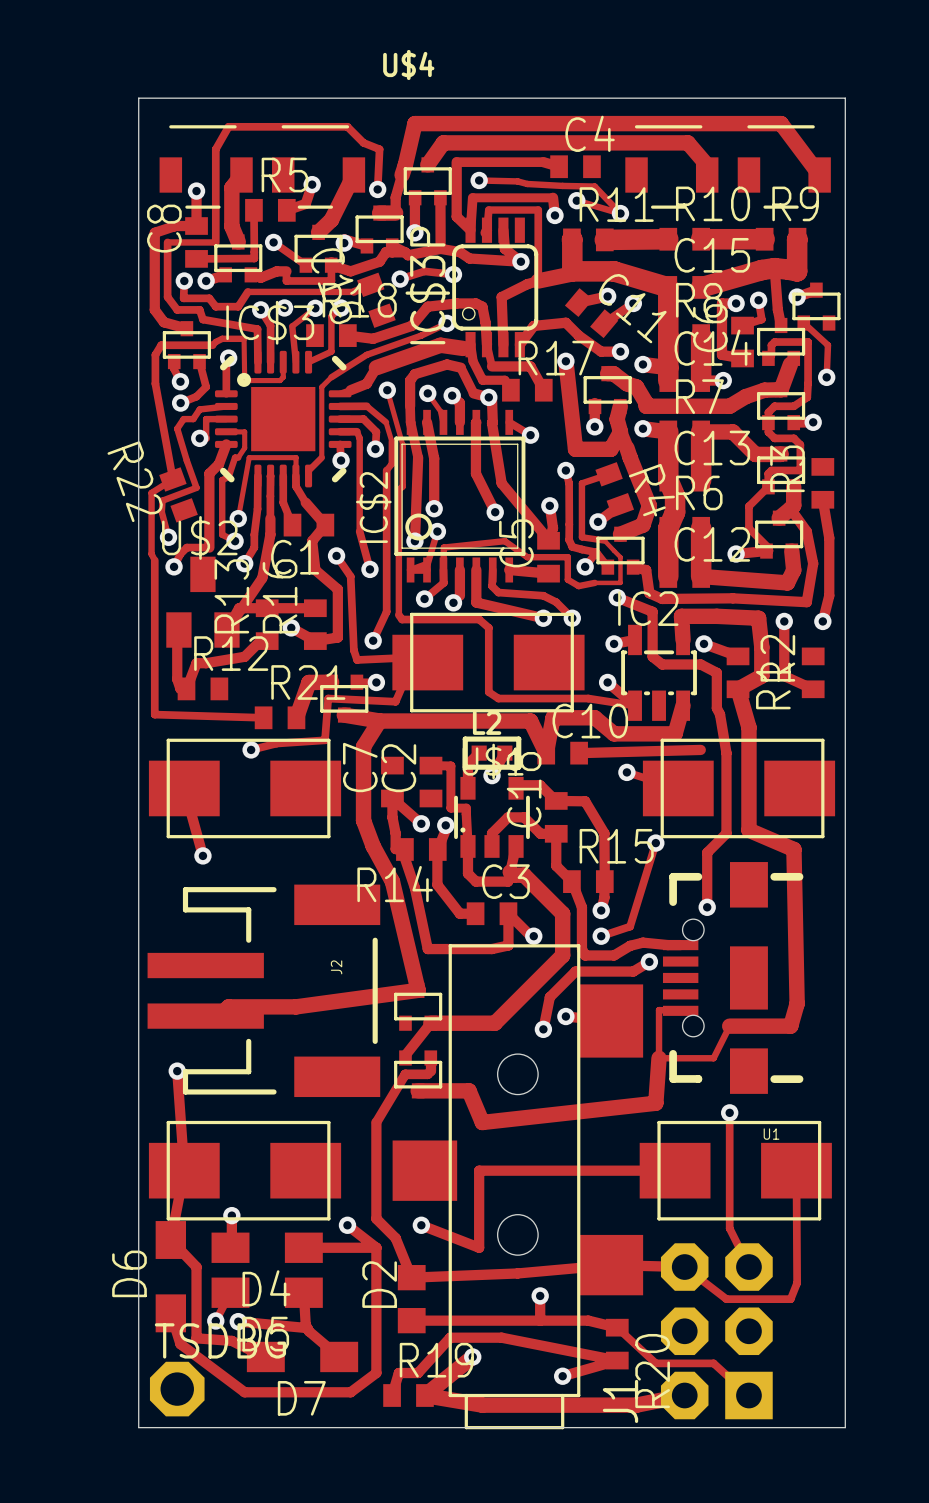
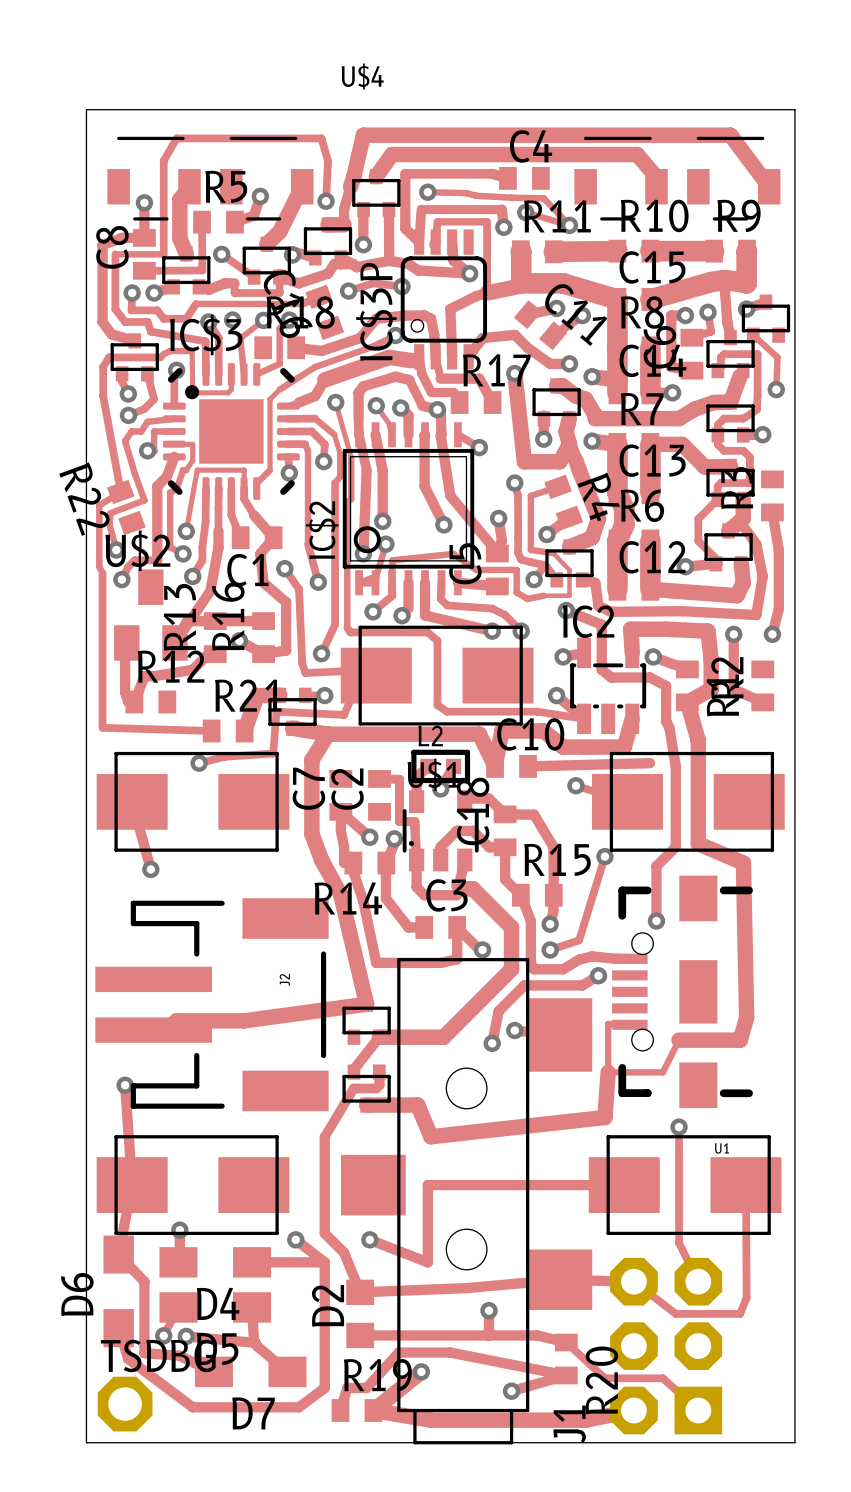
track: (347, 126) (363, 142) (379, 149) -> (295, 138) (321, 138) (327, 160)

